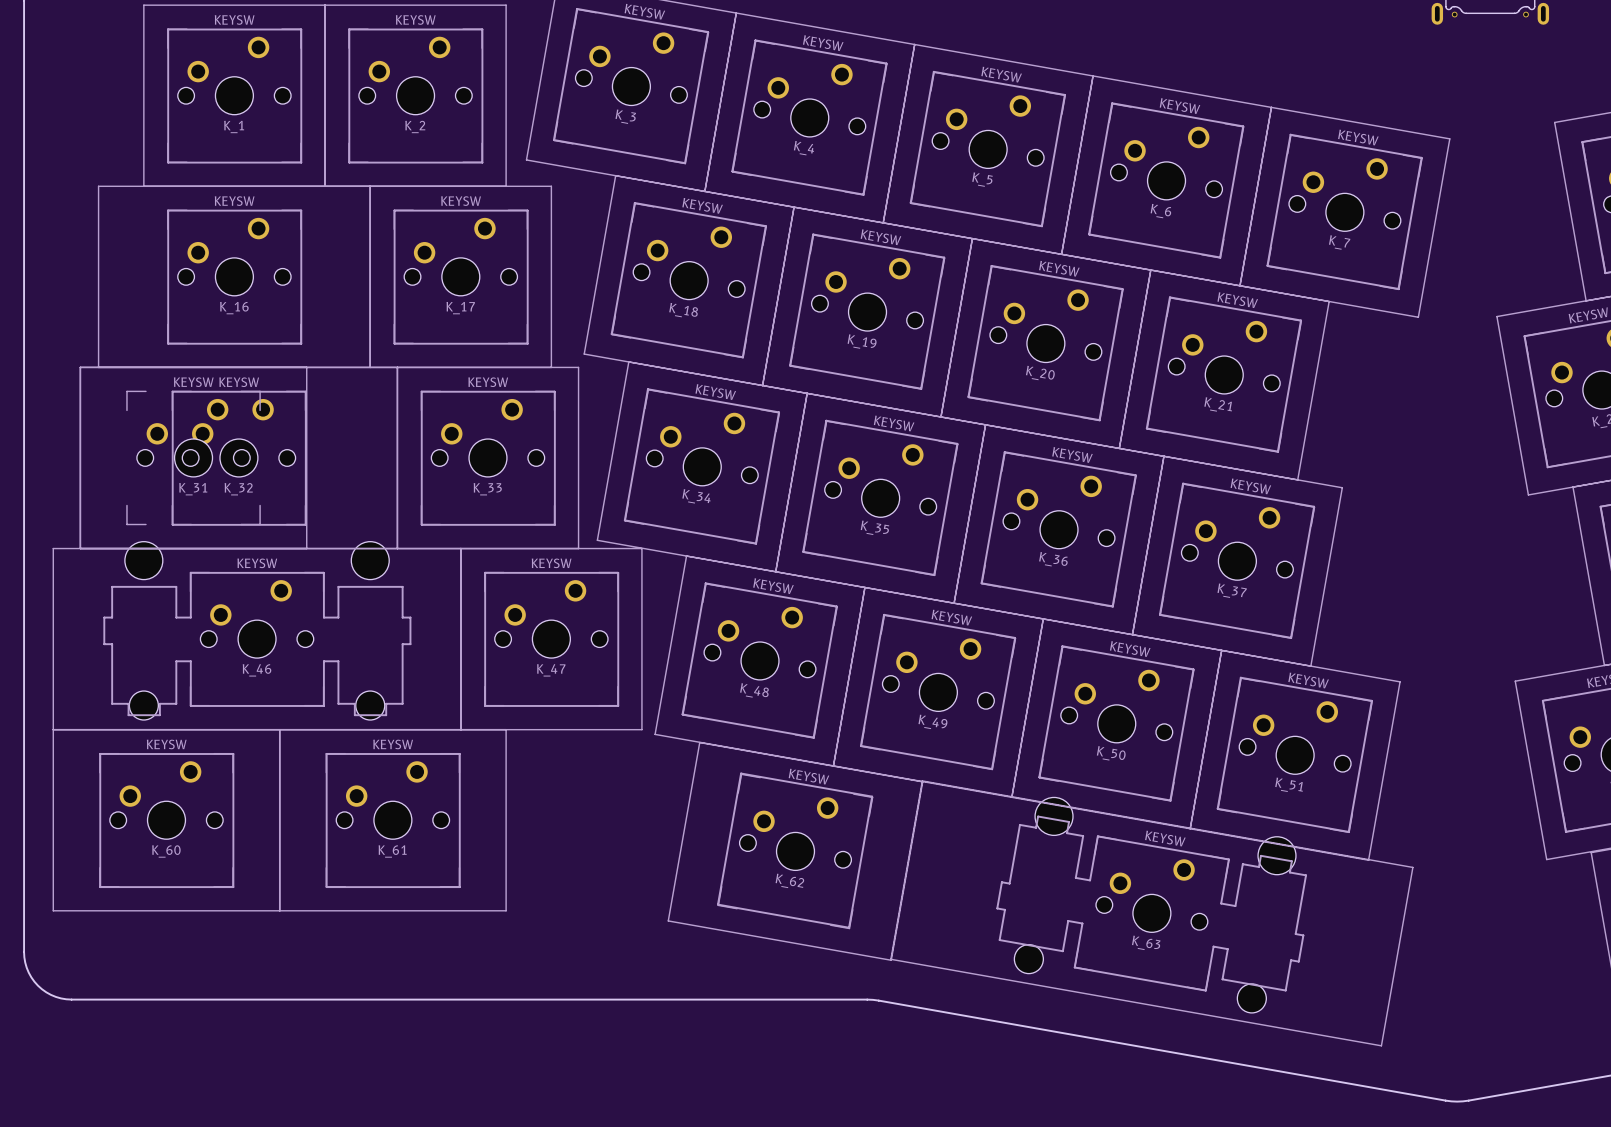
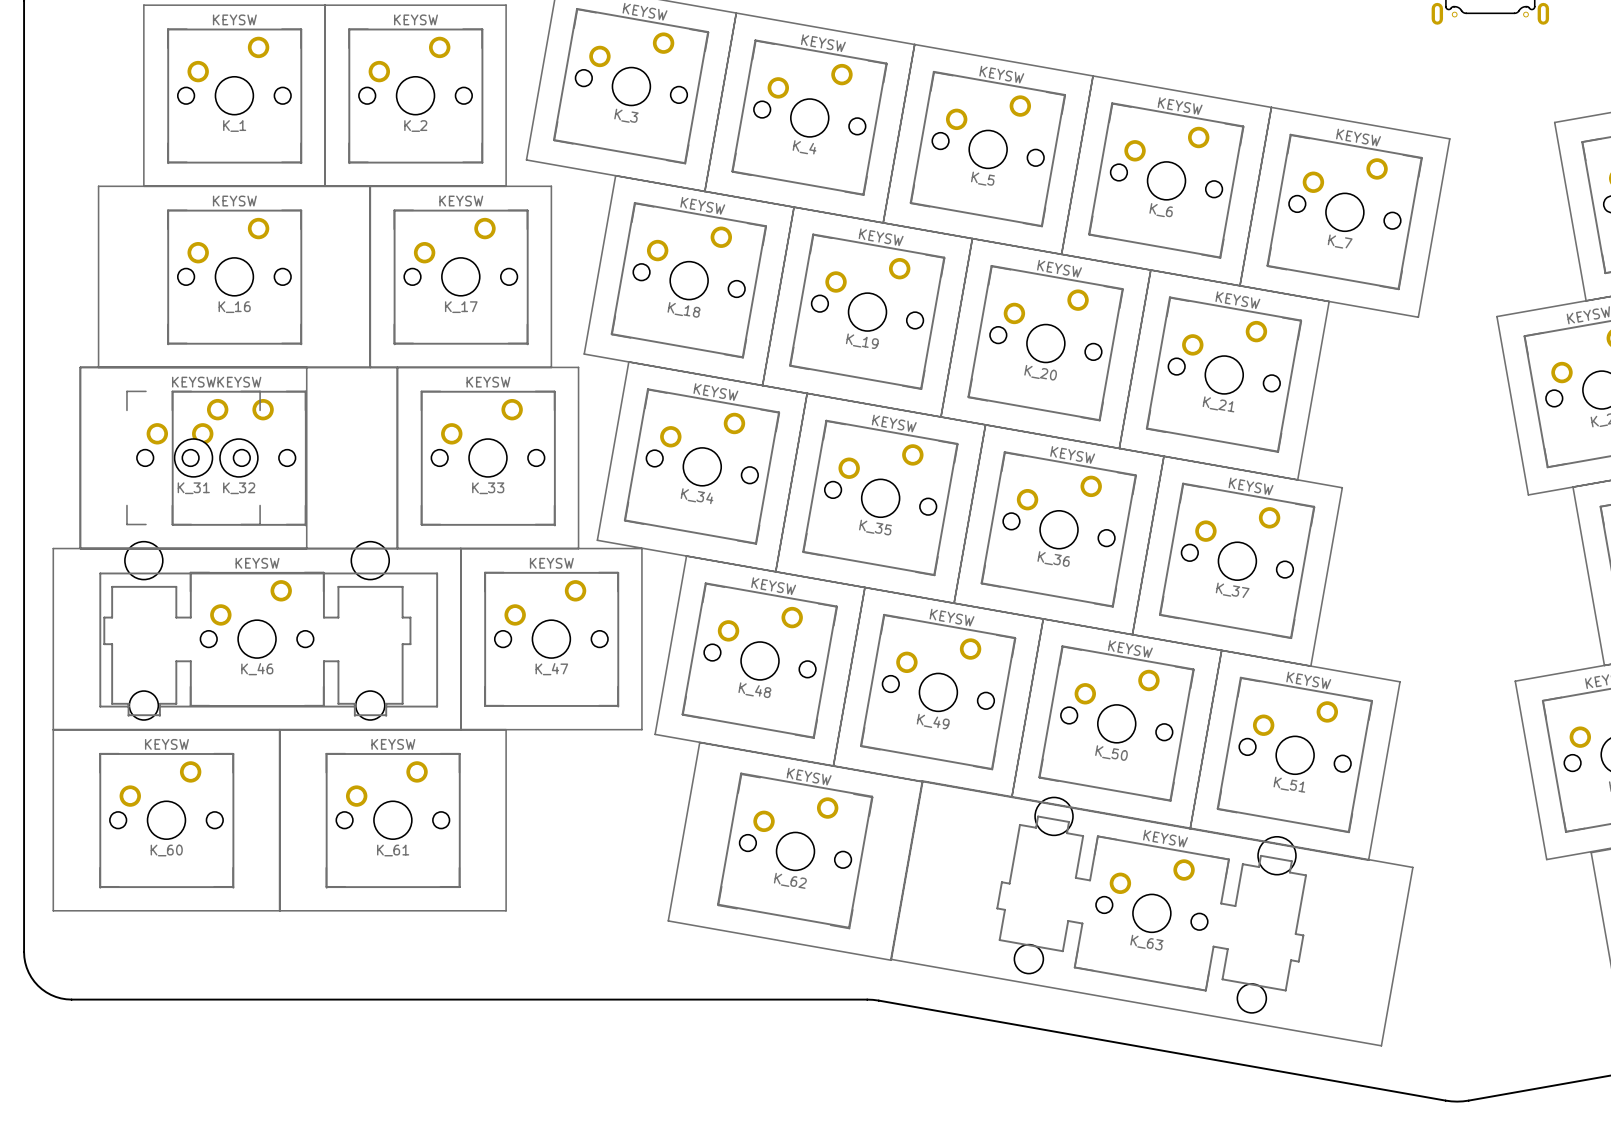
line: none -> (128, 706) (100, 706) (100, 573) (437, 573) (437, 706) (386, 706)
line: none -> (159, 706) (354, 706)

